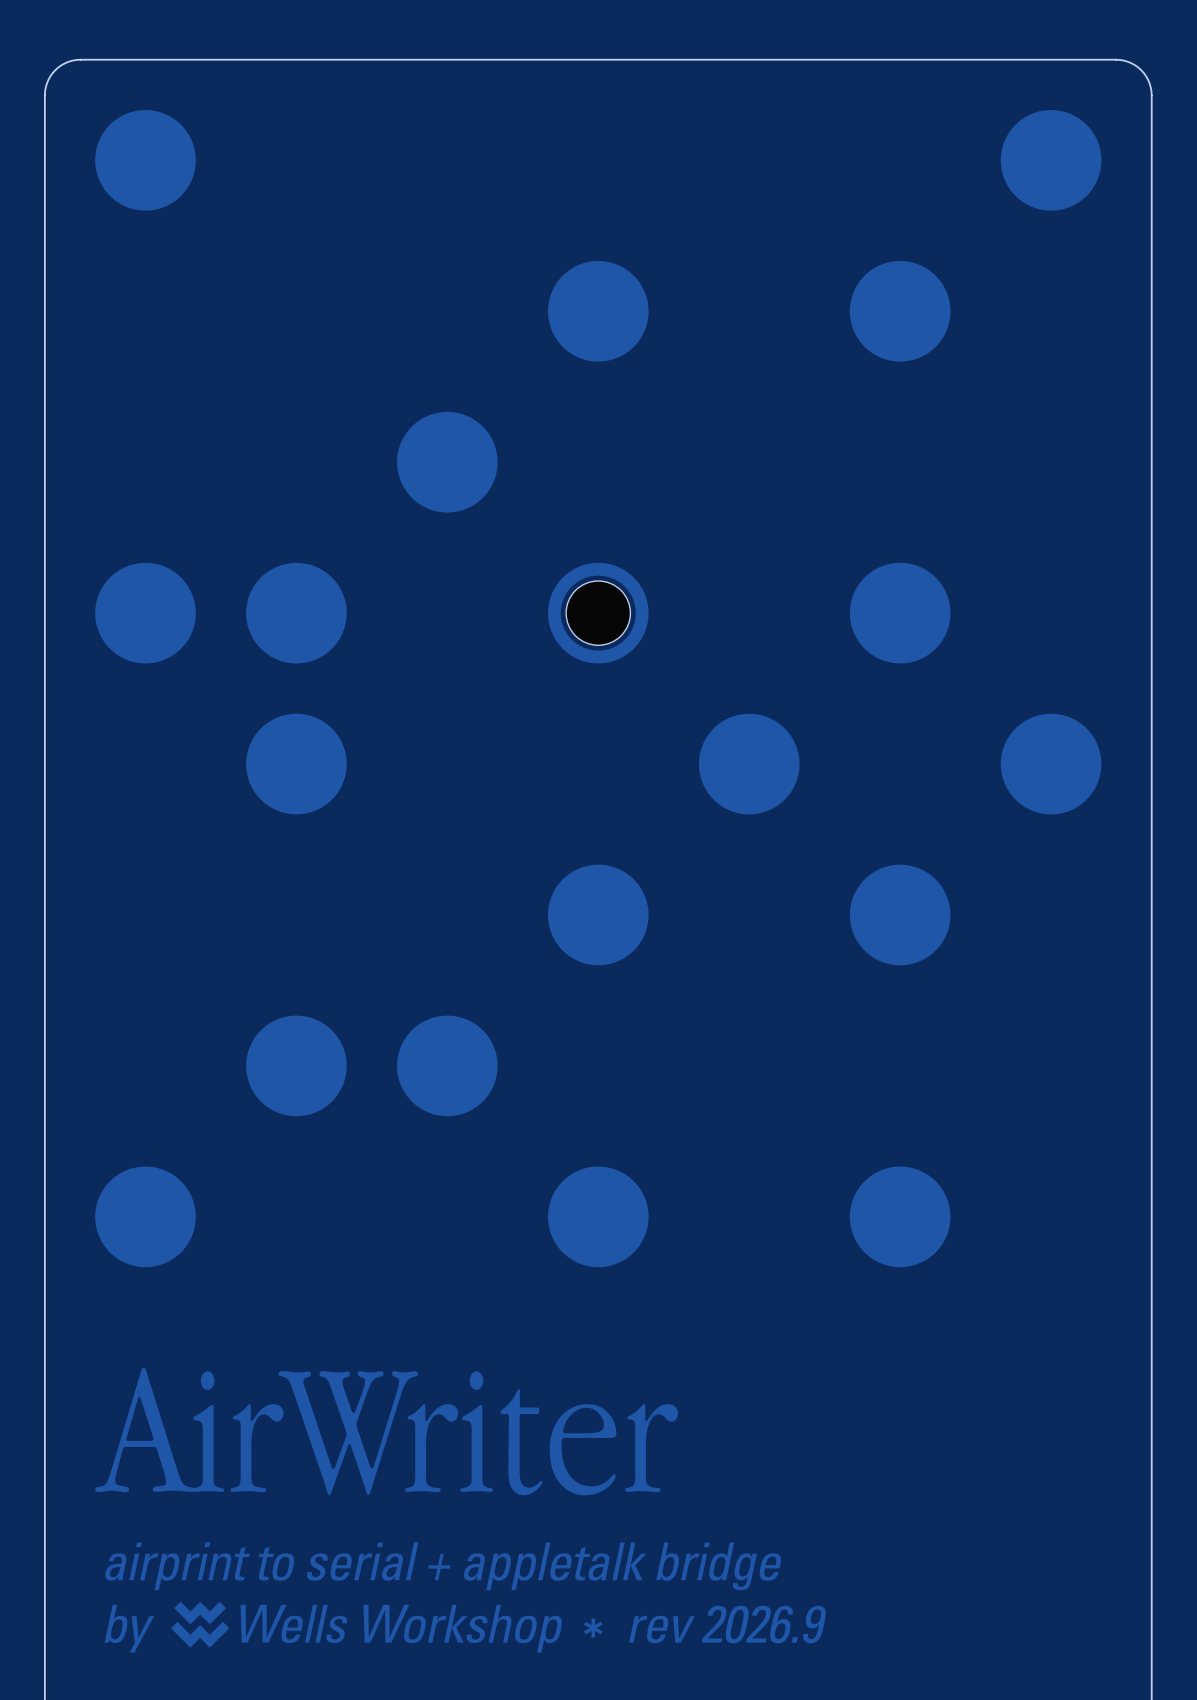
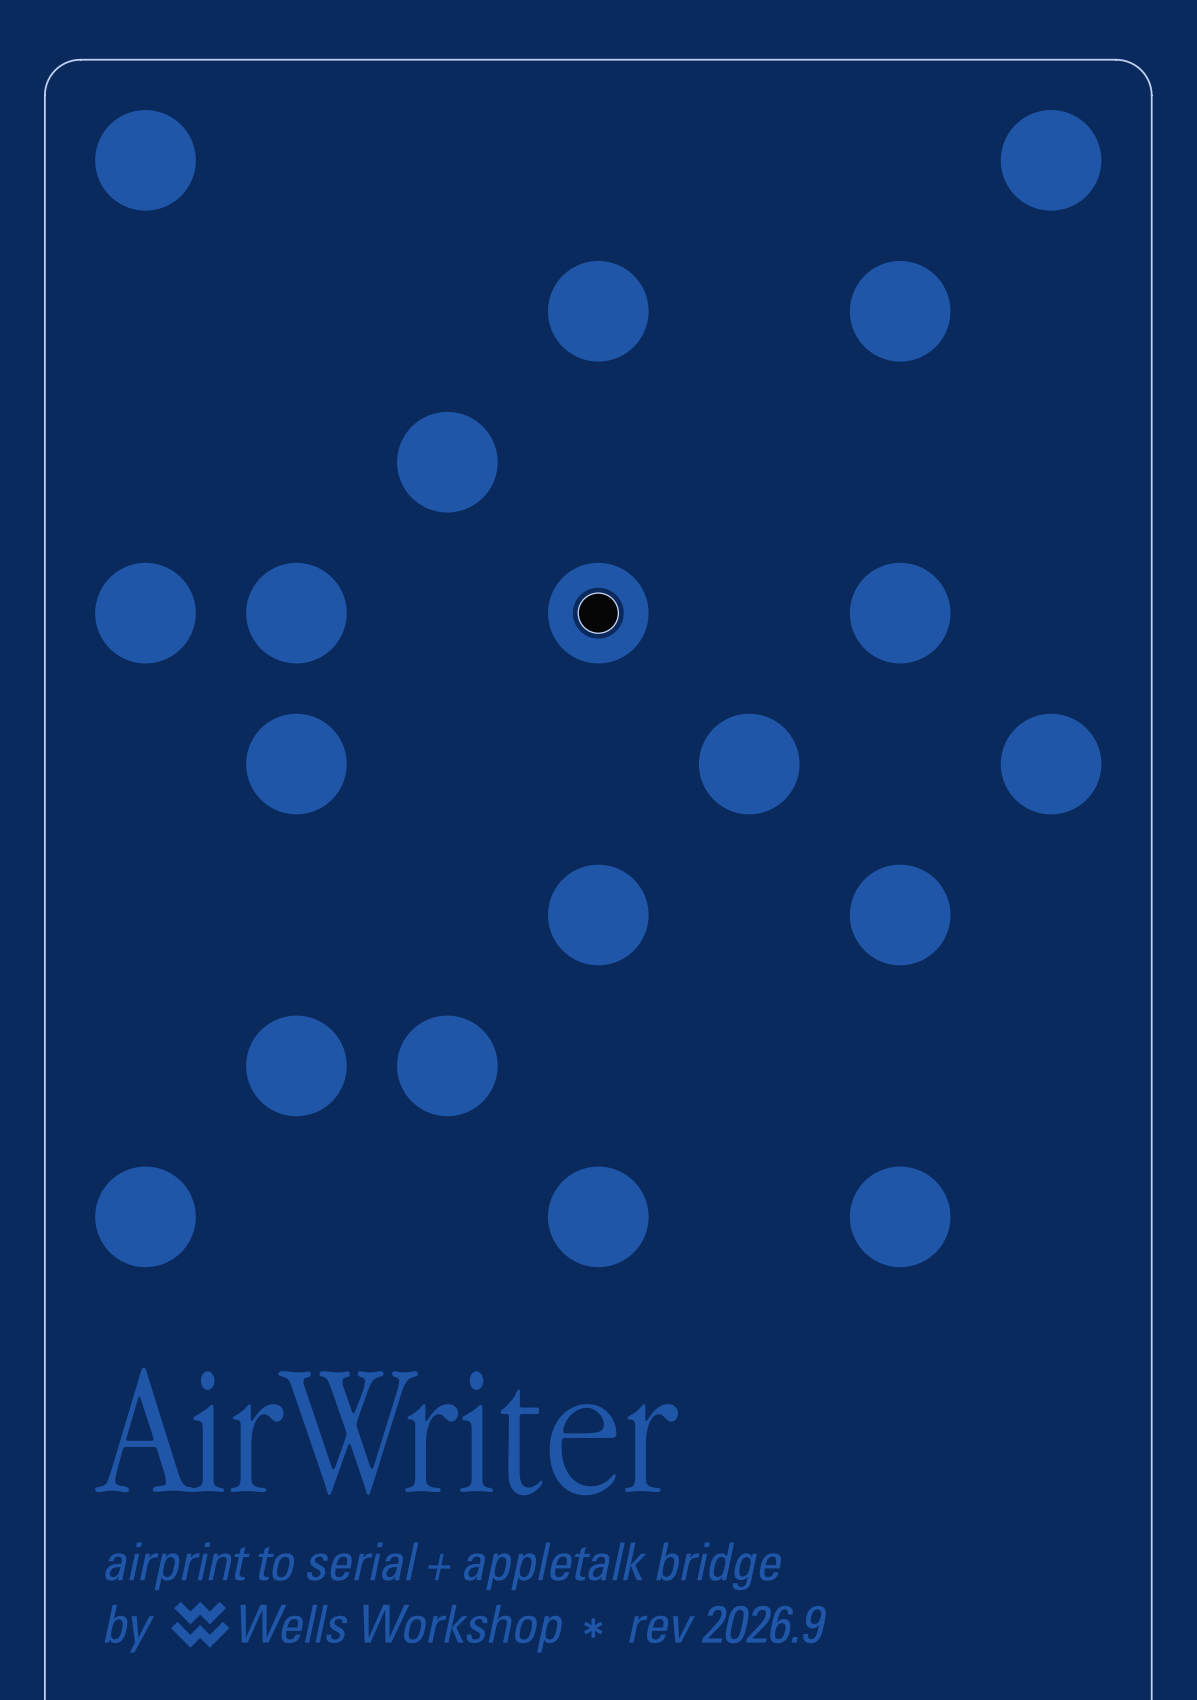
drawing shape: [547, 562, 649, 664] -> [547, 562, 649, 664]
part footprint: [566, 581, 631, 646] -> [578, 593, 619, 634]

